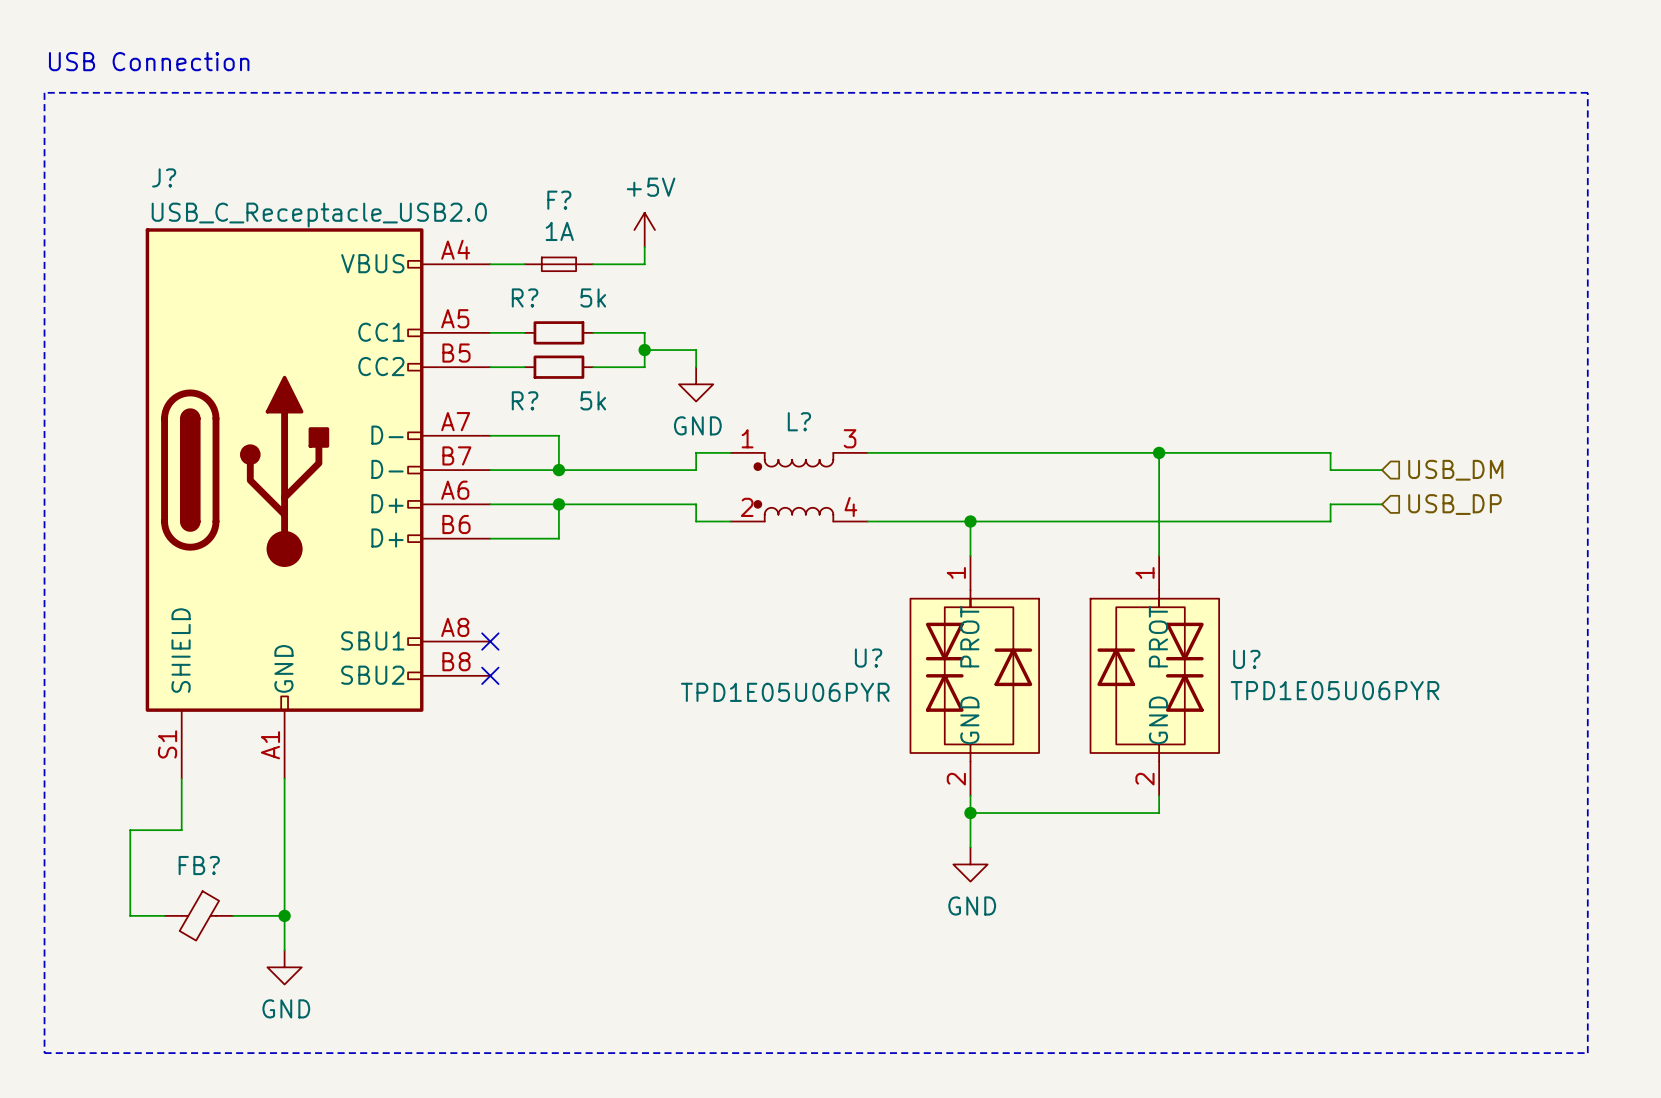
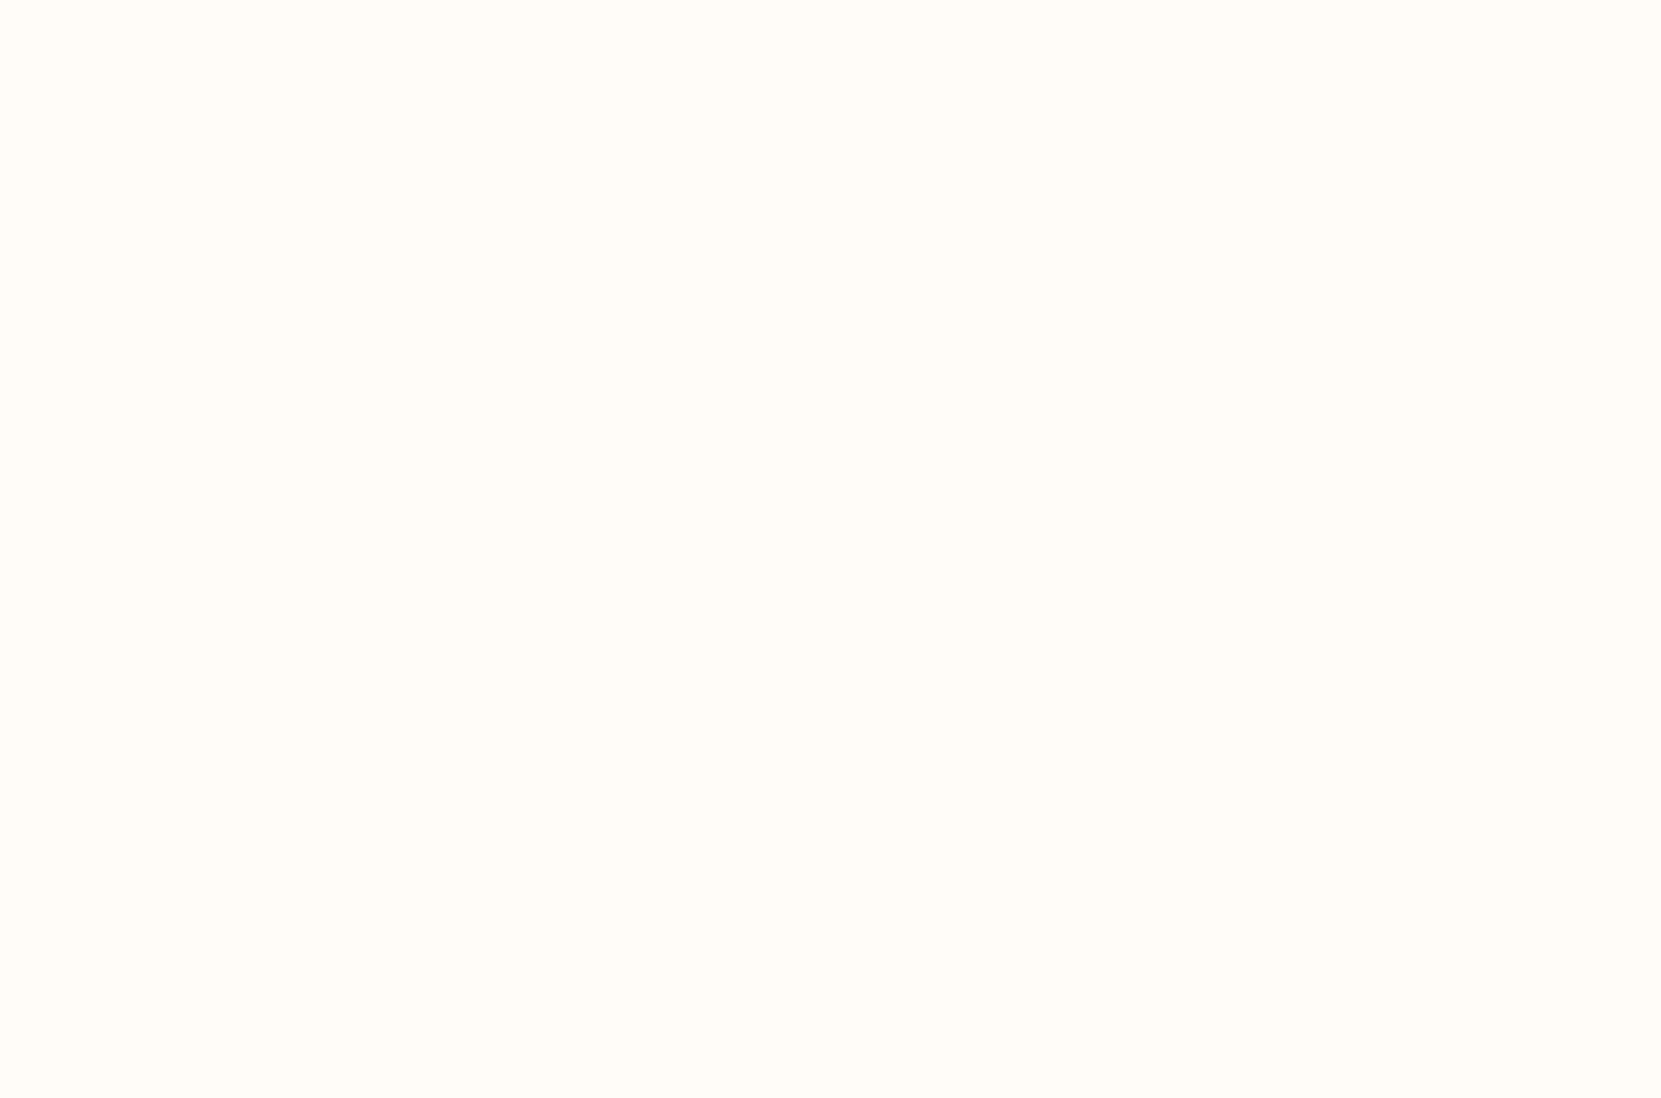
text: USB Connection (149, 61) -> none
line: (44, 92) (44, 1053) (1587, 1053) (1587, 92) (44, 92) -> none
power symbol: +5V (644, 230) -> none
wire: (644, 247) (644, 264) (593, 264) -> none
wire: (490, 264) (524, 264) -> none
F?: 1A (558, 264) -> none
wire: (490, 332) (524, 332) -> none
R?: 5k (558, 332) -> none
wire: (593, 332) (644, 332) (644, 367) (593, 367) -> none
wire: (644, 350) (696, 350) (696, 367) -> none
junction: (644, 350) -> none
wire: (490, 367) (524, 367) -> none
R?: 5k (558, 367) -> none
power symbol: GND (696, 384) -> none
wire: (490, 435) (558, 435) (558, 470) -> none
wire: (730, 452) (696, 452) (696, 470) (490, 470) -> none
wire: (867, 452) (1330, 452) (1330, 470) (1382, 470) -> none
wire: (1159, 452) (1159, 555) -> none
junction: (1159, 452) -> none
junction: (558, 470) -> none
hierarchical label: USB_DM (1455, 470) -> none
L?: (799, 487) -> none
J?: USB_C_Receptacle_USB2.0 (318, 503) -> none
wire: (490, 504) (696, 504) (696, 521) (730, 521) -> none
wire: (558, 504) (558, 538) (490, 538) -> none
junction: (558, 504) -> none
wire: (1382, 504) (1330, 504) (1330, 521) (867, 521) -> none
hierarchical label: USB_DP (1454, 504) -> none
wire: (970, 521) (970, 555) -> none
junction: (970, 521) -> none
no-connect mark: (490, 641) -> none
no-connect mark: (490, 675) -> none
U?: TPD1E05U06PYR (974, 675) -> none
U?: TPD1E05U06PYR (1154, 675) -> none
wire: (181, 778) (181, 830) (130, 830) (130, 915) (164, 915) -> none
wire: (284, 778) (284, 950) -> none
wire: (970, 795) (970, 847) -> none
wire: (1159, 795) (1159, 813) (970, 813) -> none
junction: (970, 813) -> none
power symbol: GND (970, 864) -> none
FB?: (198, 915) -> none
wire: (233, 915) (284, 915) -> none
junction: (284, 915) -> none
power symbol: GND (284, 967) -> none

